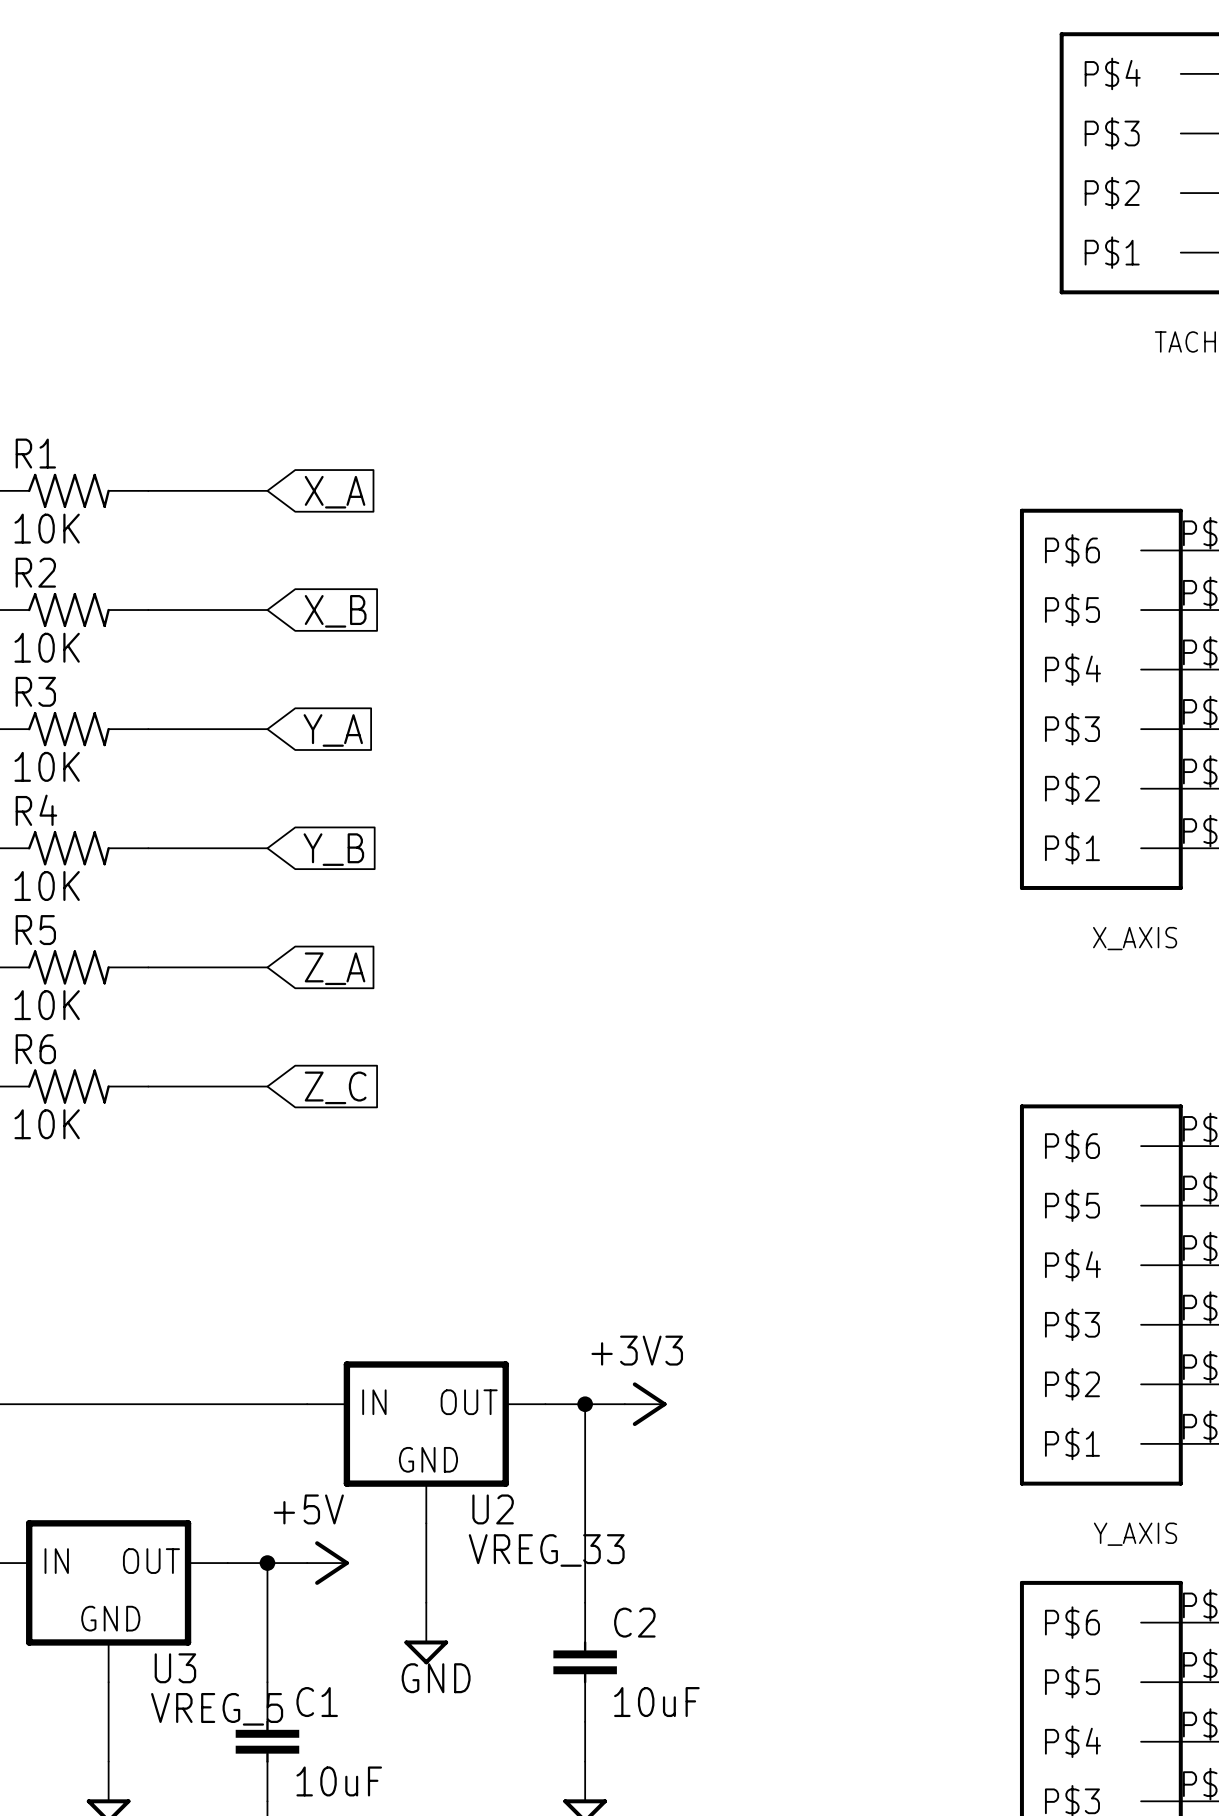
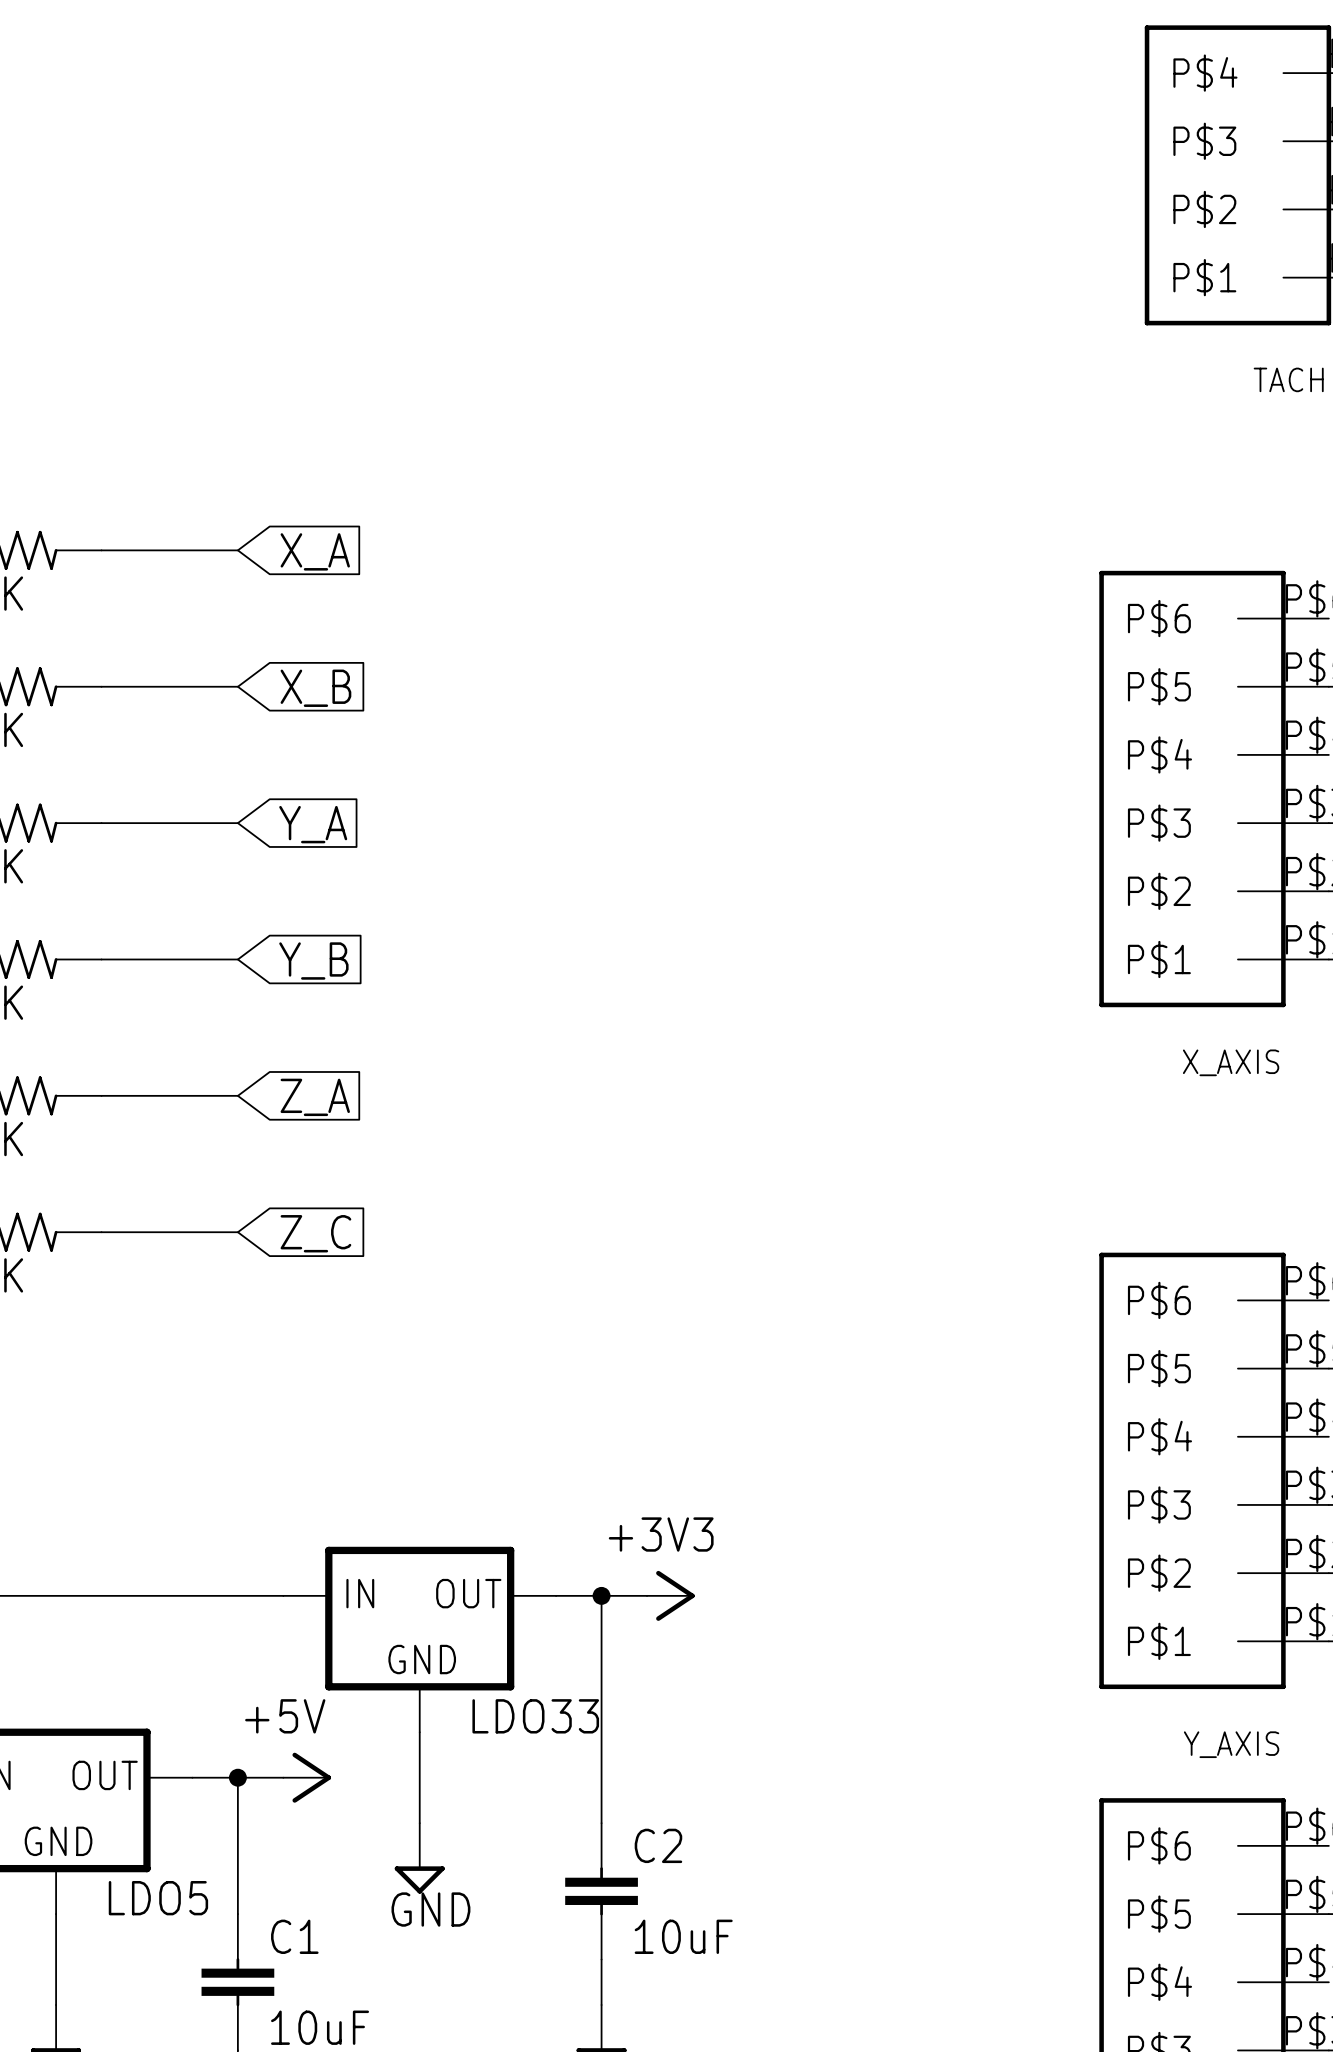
U2 name: U2 (493, 1509) -> LDO33 (535, 1716)
U2 value: VREG_33 (546, 1550) -> none
U3 name: U3 (175, 1668) -> LDO5 (158, 1898)
U3 value: VREG_5 (217, 1709) -> none

